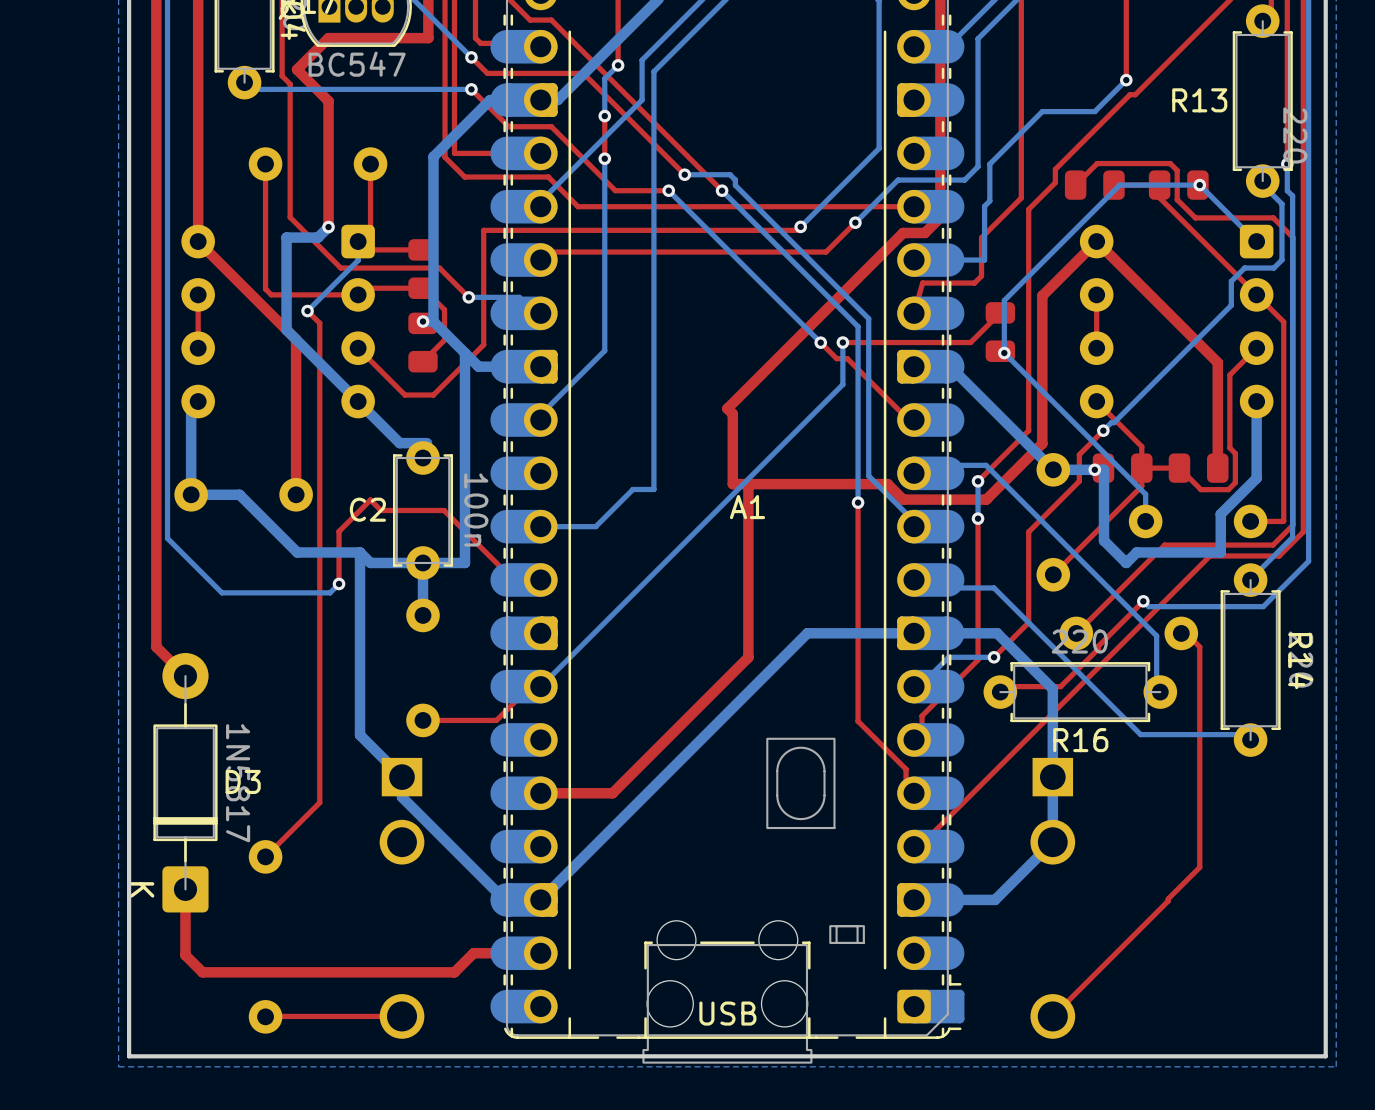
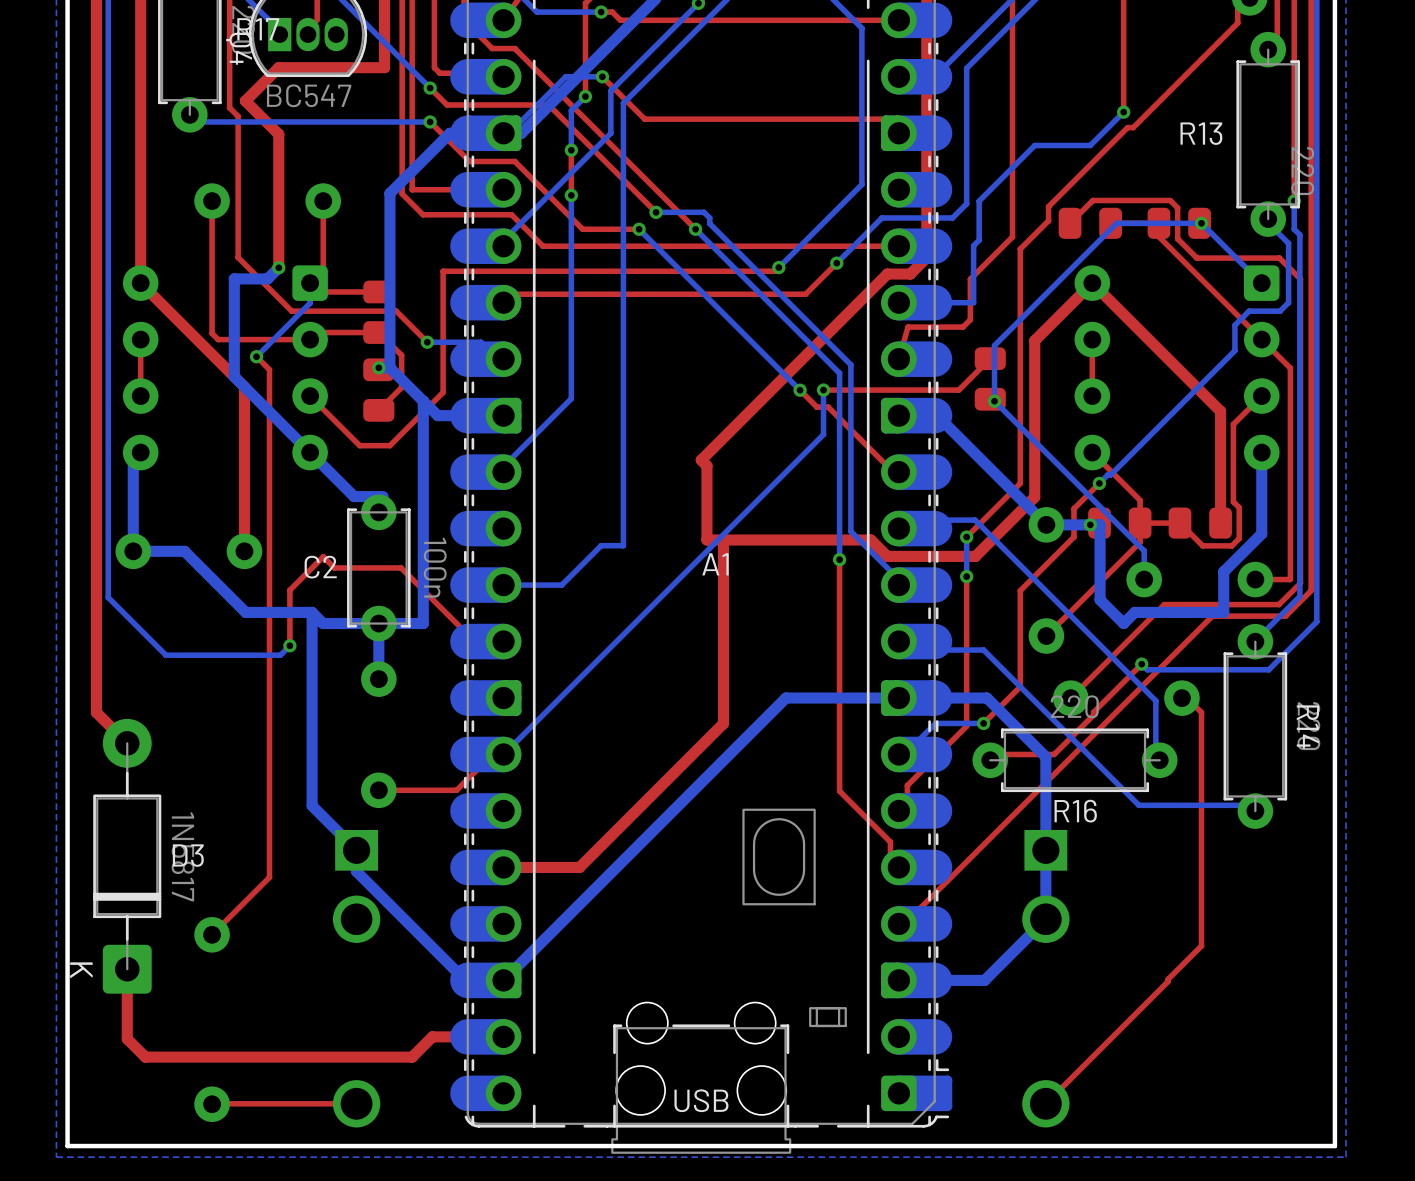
top track: none -> (602, 76) (644, 119) (884, 119)
bottom track: none -> (602, 76) (565, 76) (517, 124)
via: none -> (602, 76)

